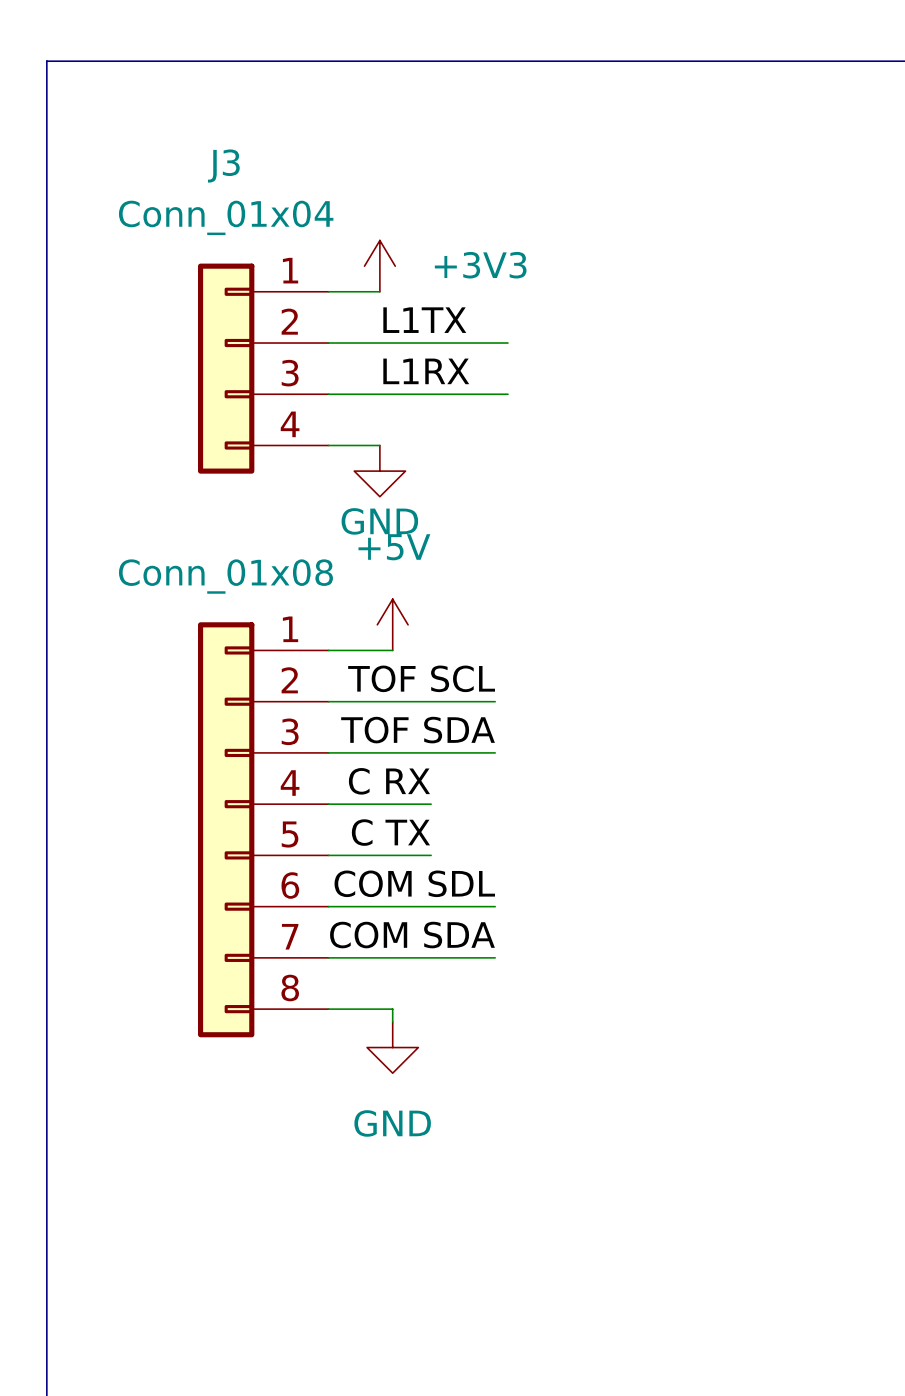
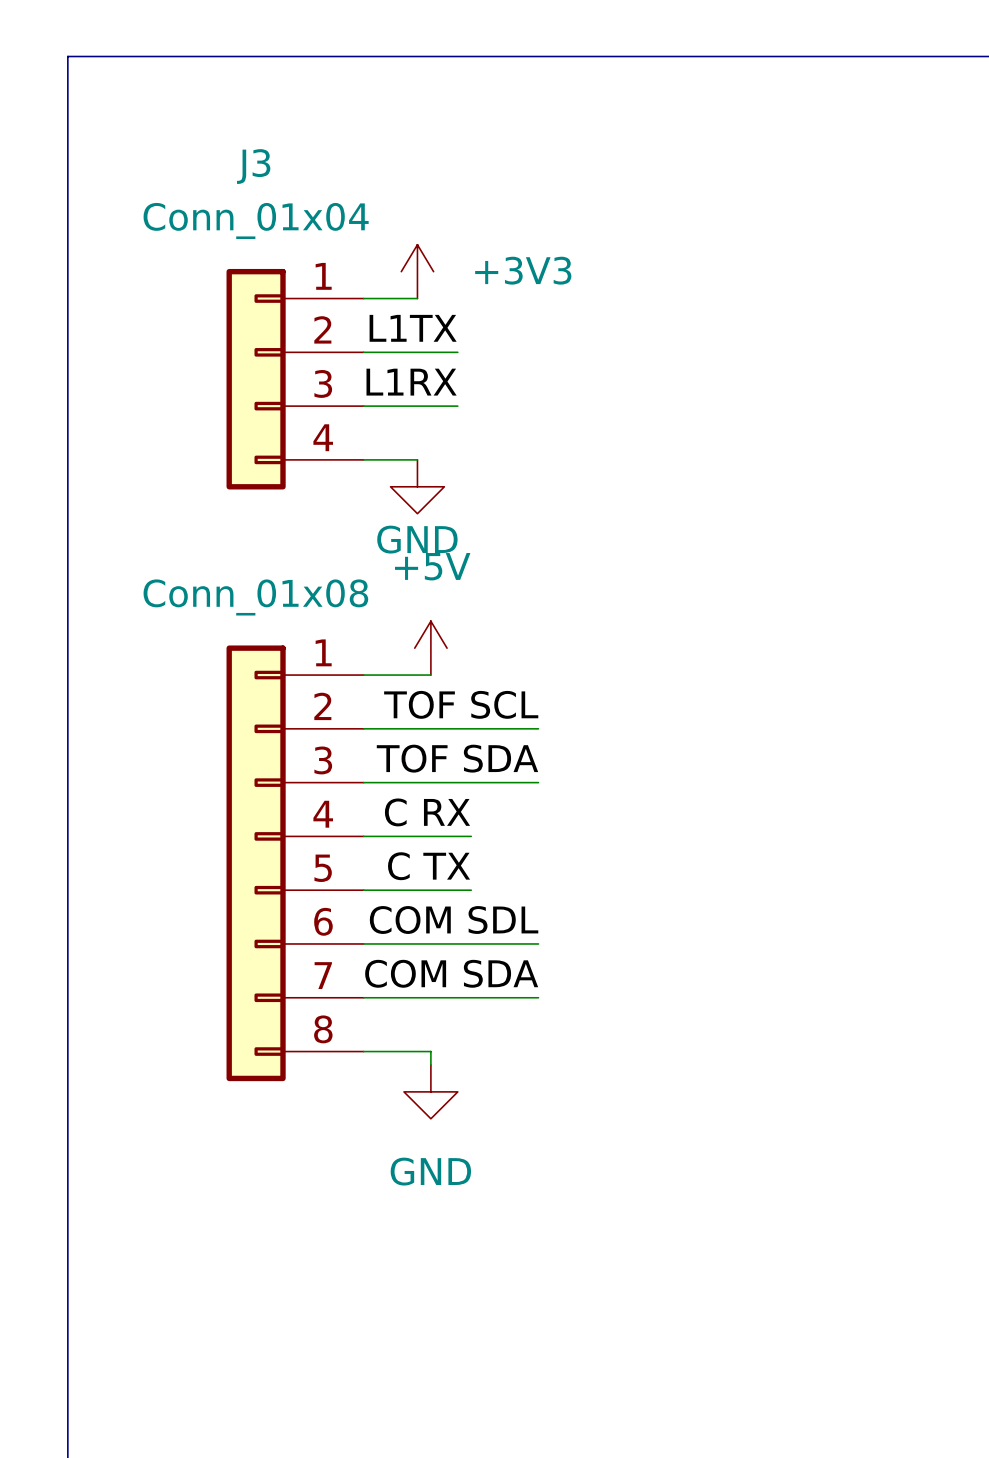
label position: L1TX (424, 320) -> L1TX (413, 328)
wire: (418, 343) (507, 343) -> none
label position: L1RX (426, 371) -> L1RX (411, 382)
wire: (418, 394) (507, 394) -> none

